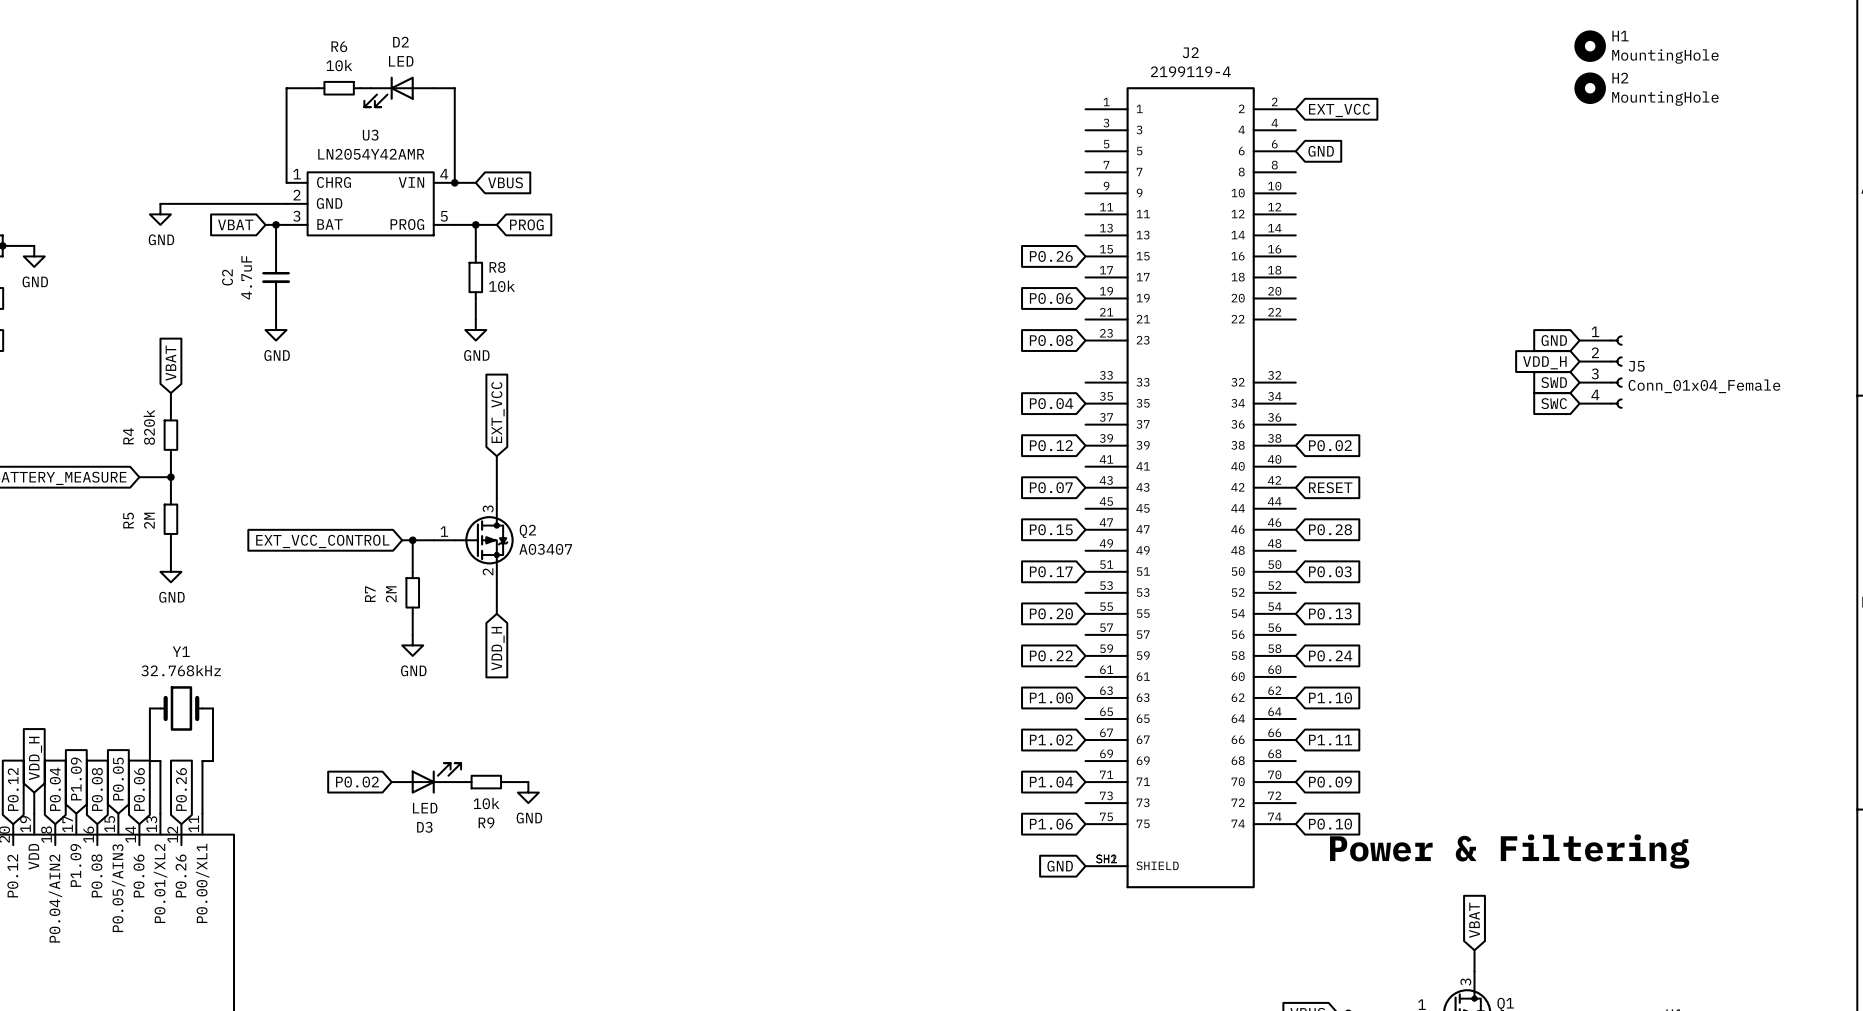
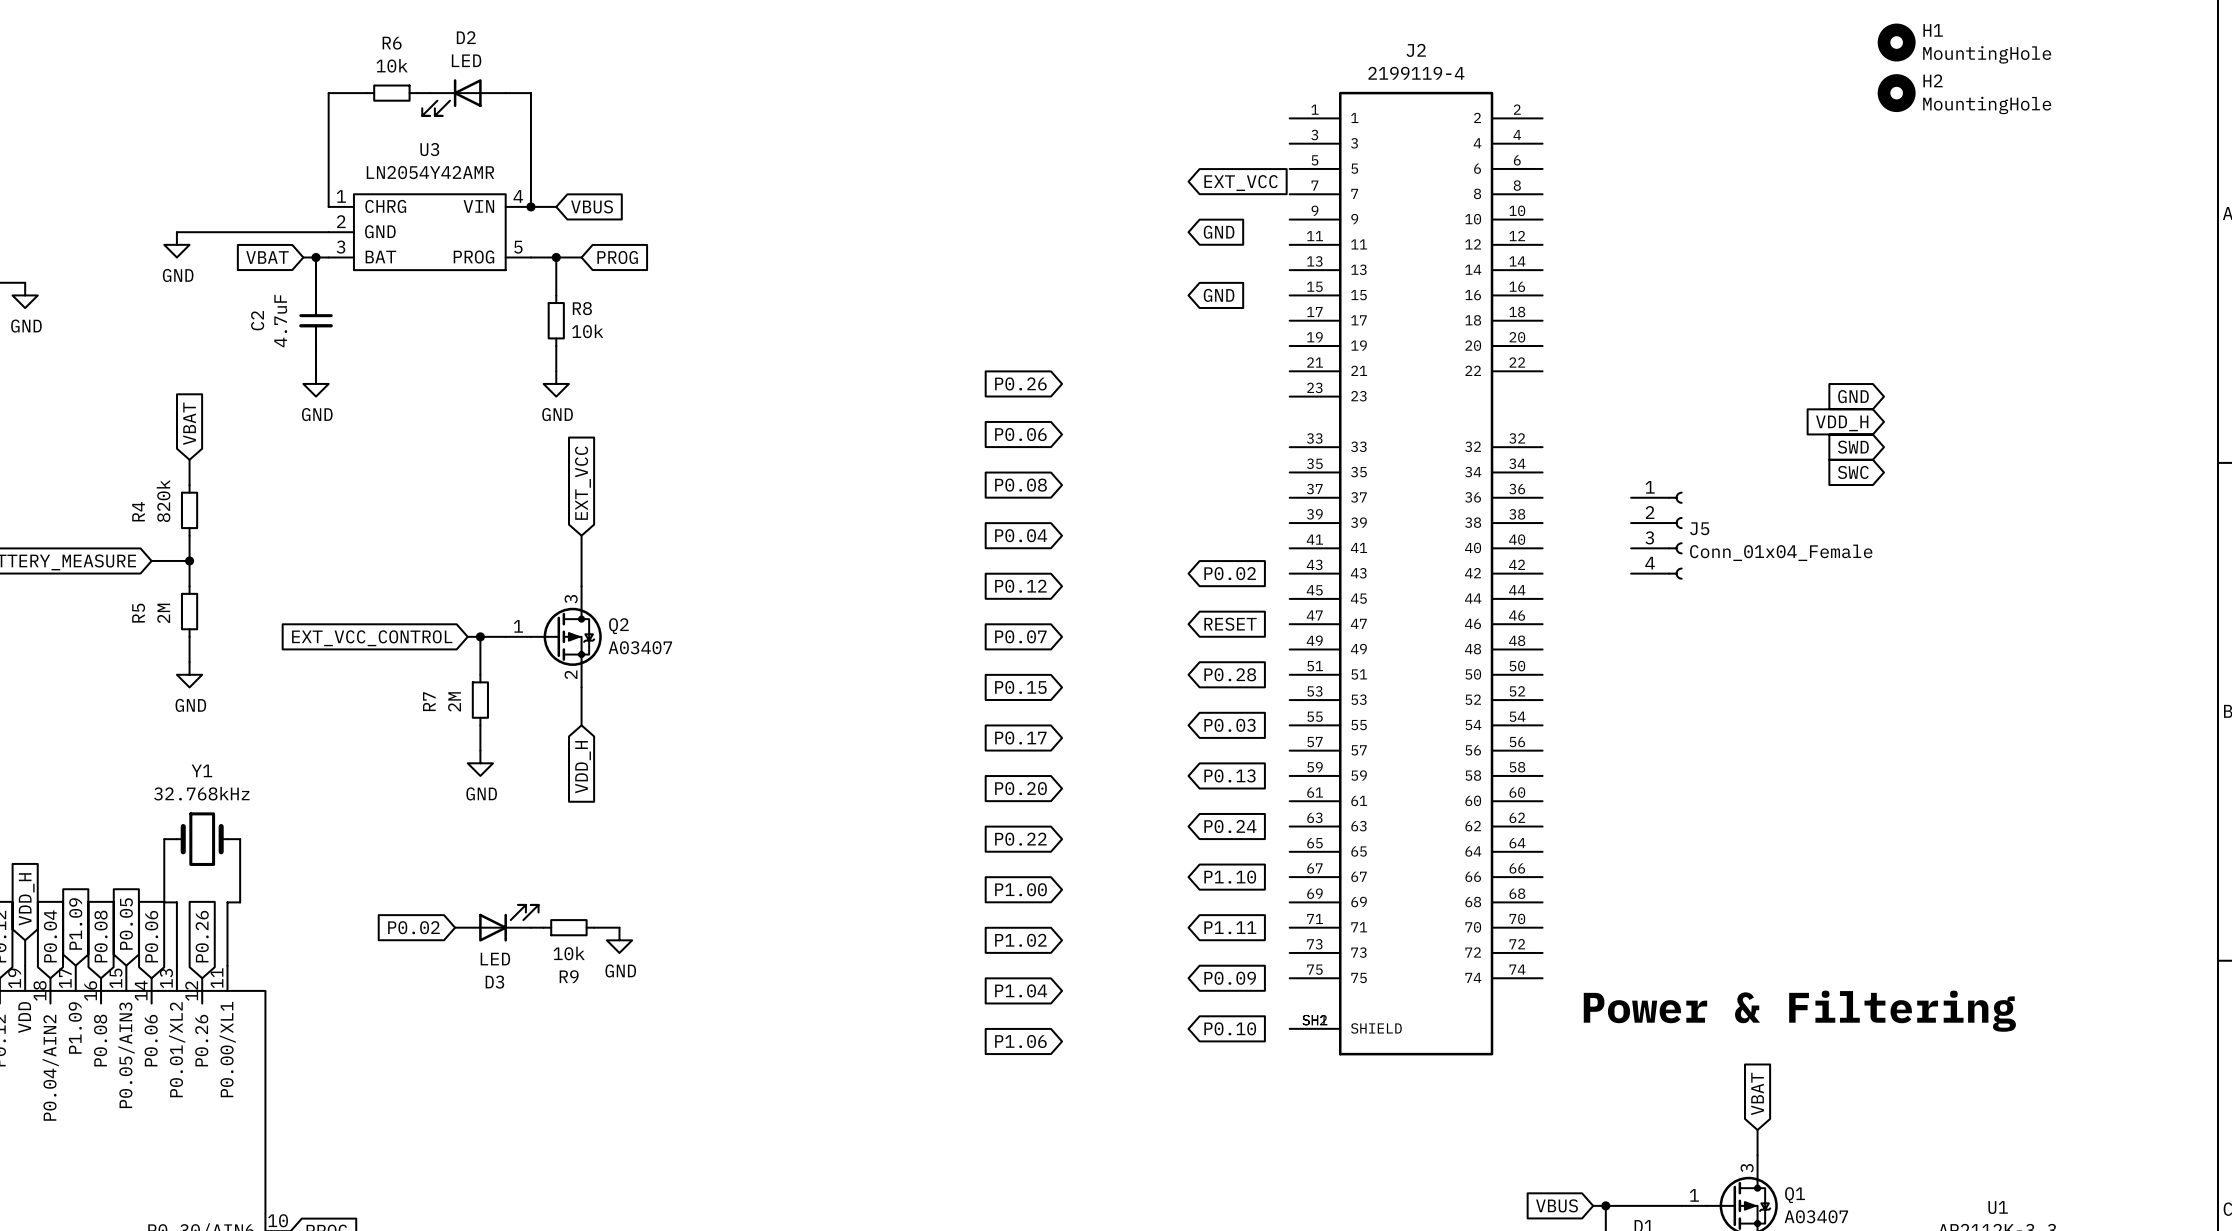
global label: EXT_VCC (1339, 110) -> none
global label: GND (1321, 151) -> none
global label: none -> EXT_VCC (1241, 183)
global label: none -> GND (1219, 232)
global label: none -> GND (1219, 295)
global label position: P0.26 (1051, 256) -> P0.26 (1020, 383)
global label position: P0.06 (1051, 298) -> P0.06 (1020, 434)
global label position: P0.08 (1051, 340) -> P0.08 (1020, 485)
J5 position: (1600, 372) -> (1656, 535)
global label position: P0.04 (1051, 403) -> P0.04 (1021, 535)
global label position: P0.12 (1051, 445) -> P0.12 (1020, 586)
global label: P0.02 (1330, 445) -> none
global label: none -> P0.02 (1230, 573)
global label position: P0.07 (1051, 487) -> P0.07 (1020, 636)
global label: RESET (1330, 487) -> none
global label: none -> RESET (1230, 624)
global label position: P0.15 (1051, 529) -> P0.15 (1020, 687)
global label: P0.28 (1330, 529) -> none
global label: none -> P0.28 (1230, 674)
global label position: P0.17 (1051, 571) -> P0.17 (1020, 738)
global label: P0.03 (1330, 571) -> none
global label: none -> P0.03 (1230, 725)
global label position: P0.20 (1051, 613) -> P0.20 (1020, 788)
global label: P0.13 (1330, 613) -> none
global label: none -> P0.13 (1230, 775)
global label position: P0.22 (1051, 655) -> P0.22 (1020, 839)
global label: P0.24 (1330, 655) -> none
global label: none -> P0.24 (1230, 826)
global label position: P1.00 (1051, 697) -> P1.00 (1020, 889)
global label: P1.10 (1330, 697) -> none
global label: none -> P1.10 (1230, 877)
global label position: P1.02 (1051, 740) -> P1.02 (1020, 940)
global label: P1.11 (1330, 740) -> none
global label: none -> P1.11 (1230, 927)
global label position: P1.04 (1051, 782) -> P1.04 (1021, 990)
global label: P0.09 (1330, 782) -> none
global label: none -> P0.09 (1230, 978)
global label position: P1.06 (1051, 824) -> P1.06 (1020, 1041)
global label: P0.10 (1330, 824) -> none
global label: none -> P0.10 (1230, 1028)
global label: GND (1060, 866) -> none

